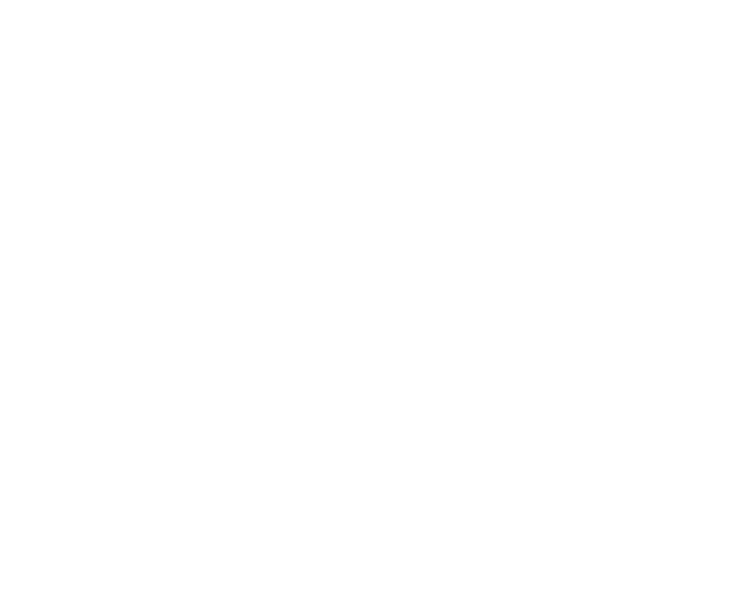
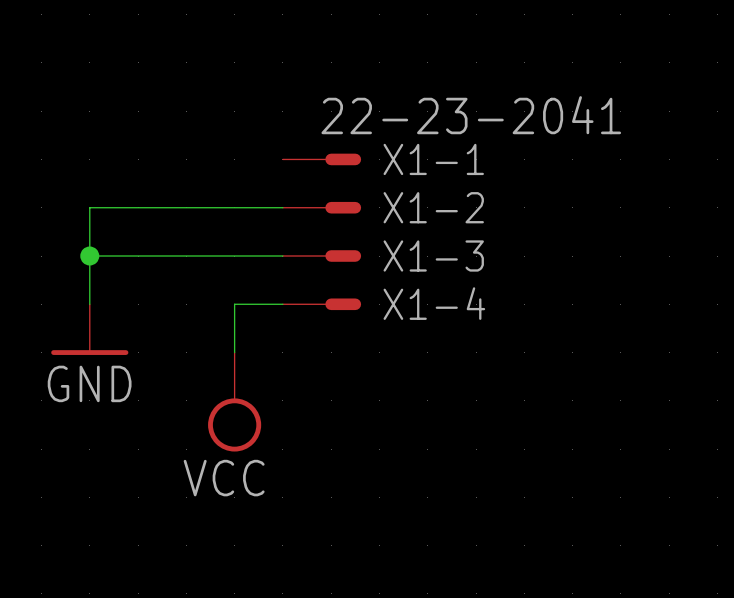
X1-1: none -> 22-23-2041 (321, 159)
wire: none -> (282, 207) (89, 207) (89, 304)
X1-2: none -> (321, 207)
wire: none -> (89, 256) (282, 256)
junction: none -> (89, 256)
X1-3: none -> (321, 256)
wire: none -> (282, 304) (234, 304) (234, 352)
X1-4: none -> (321, 304)
power symbol: none -> GND (89, 329)
power symbol: none -> VCC (234, 402)

